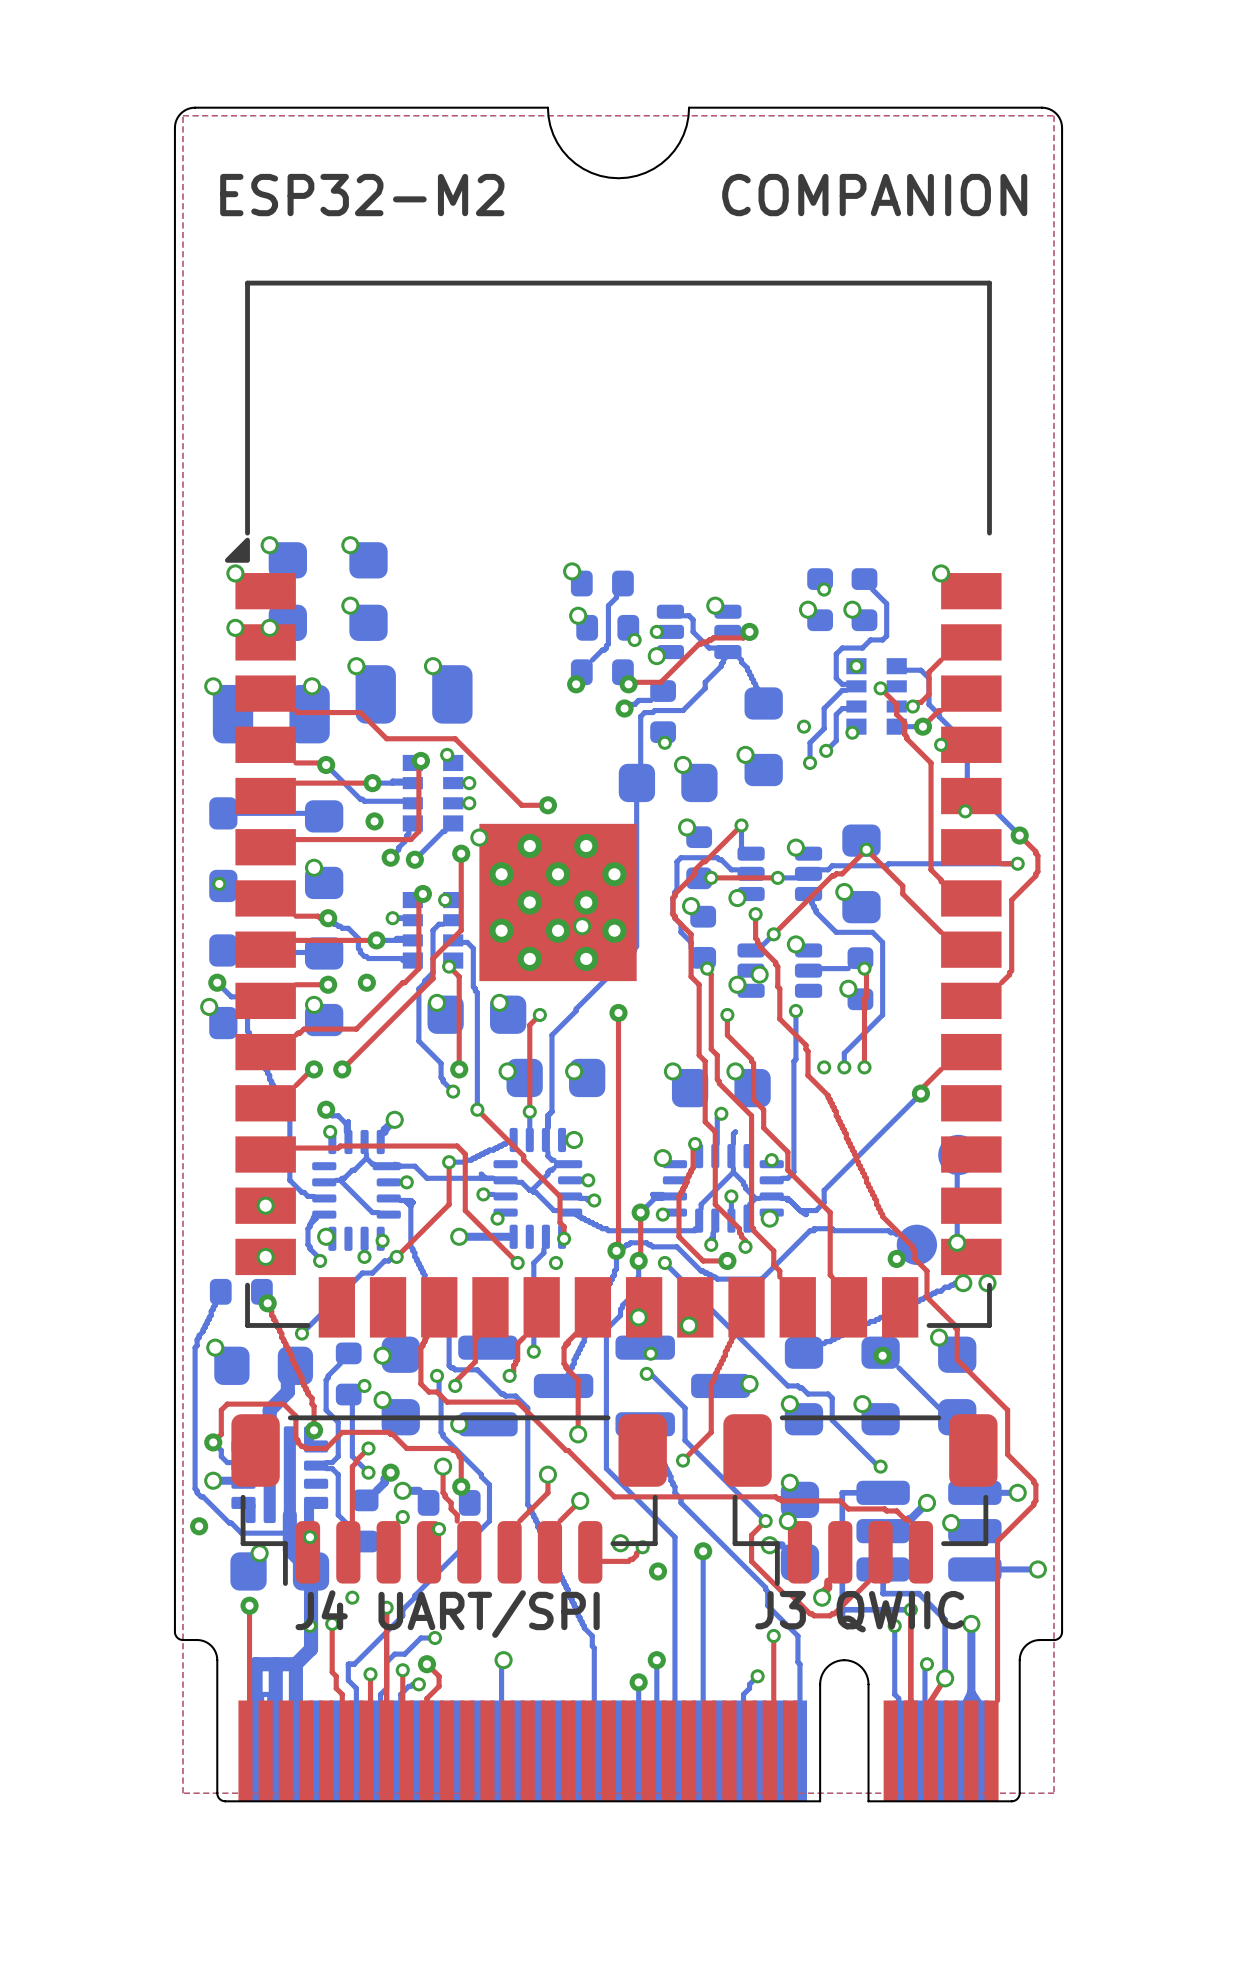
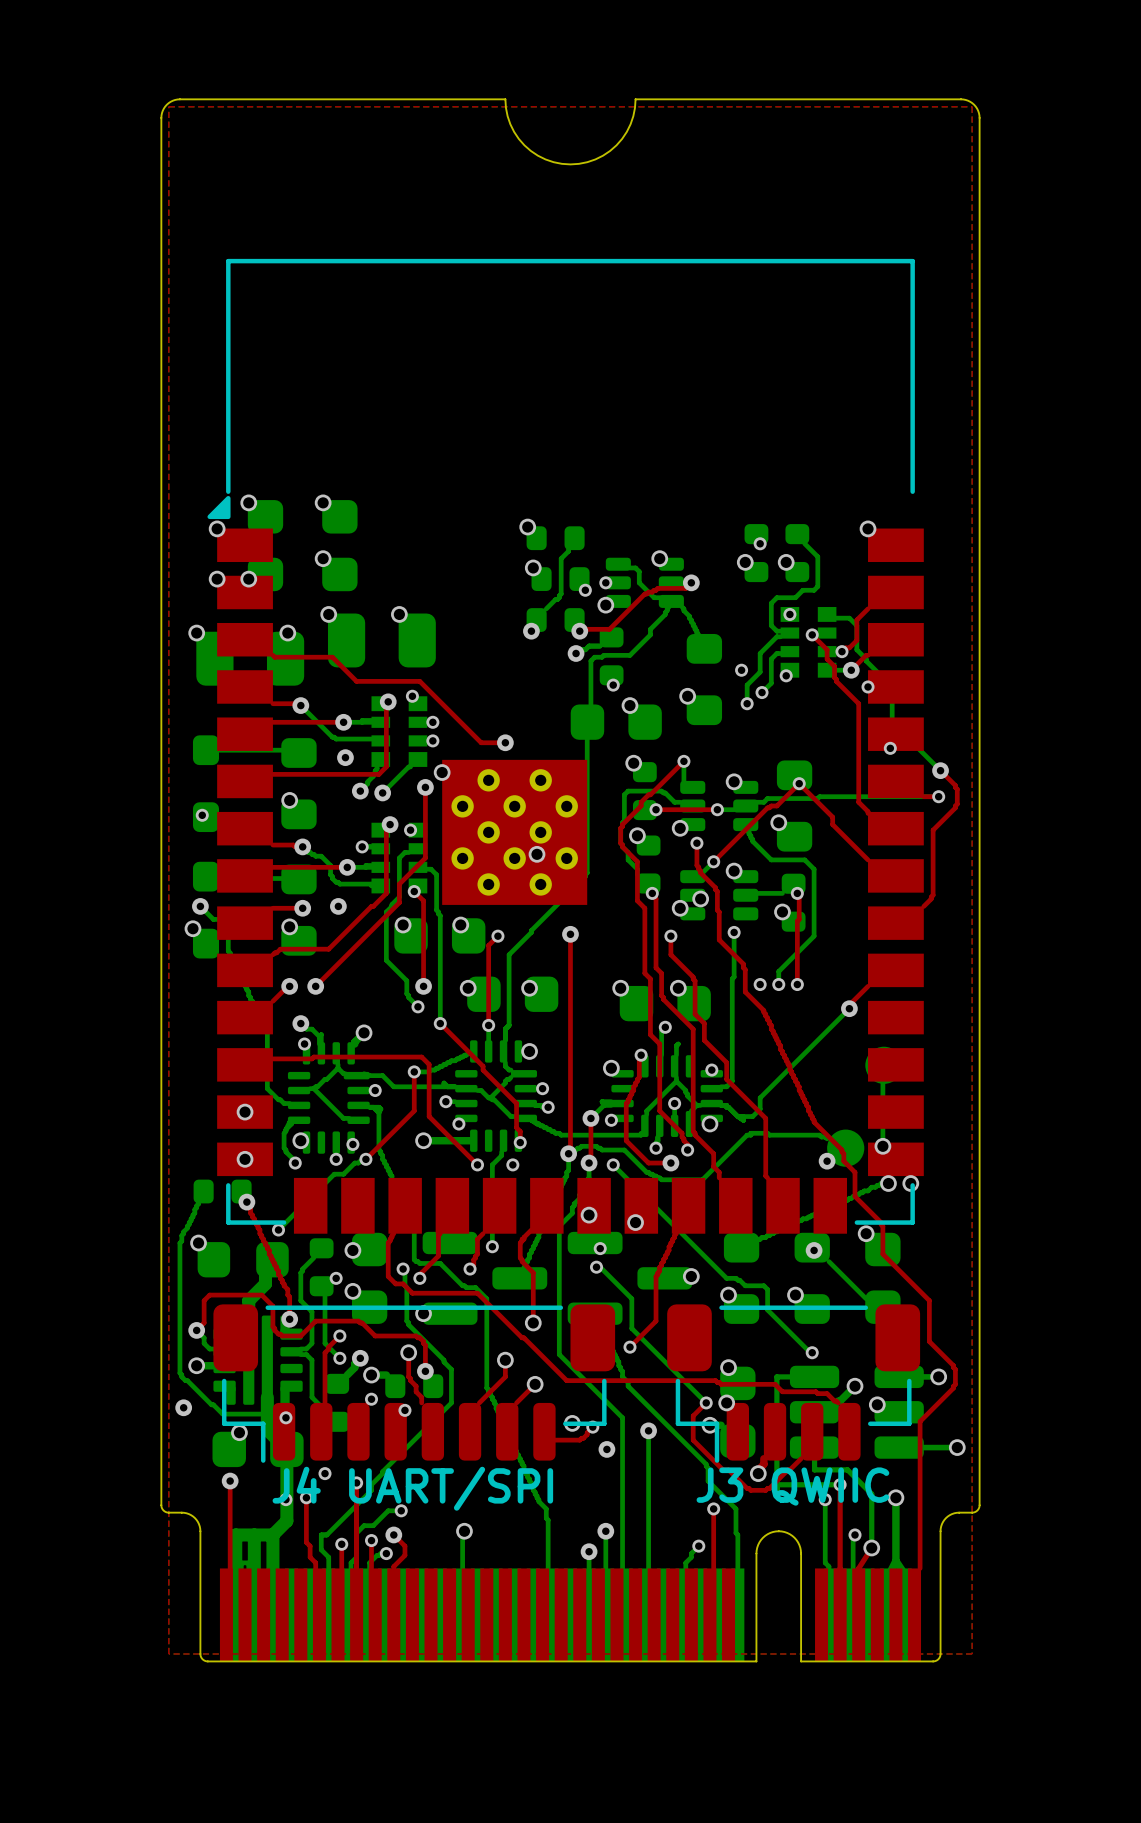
text: ESP32-M2 (362, 195) -> none
text: COMPANION (874, 195) -> none

